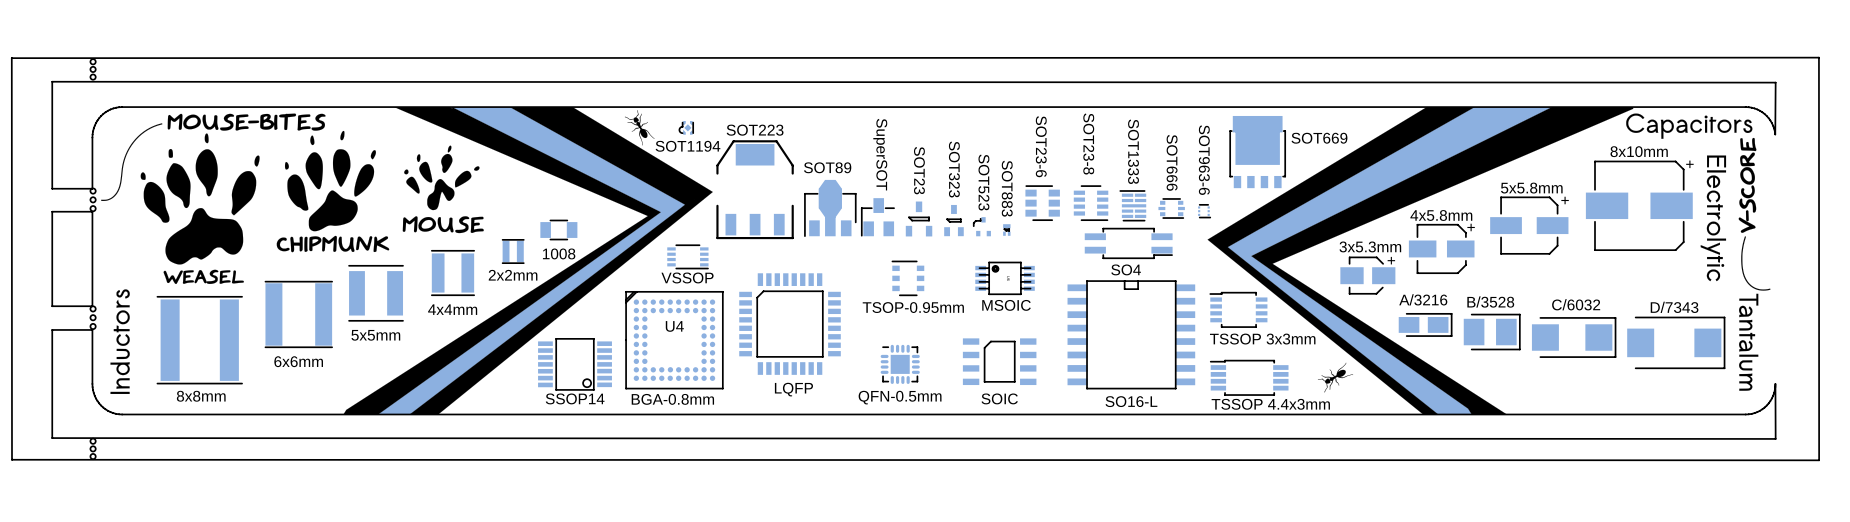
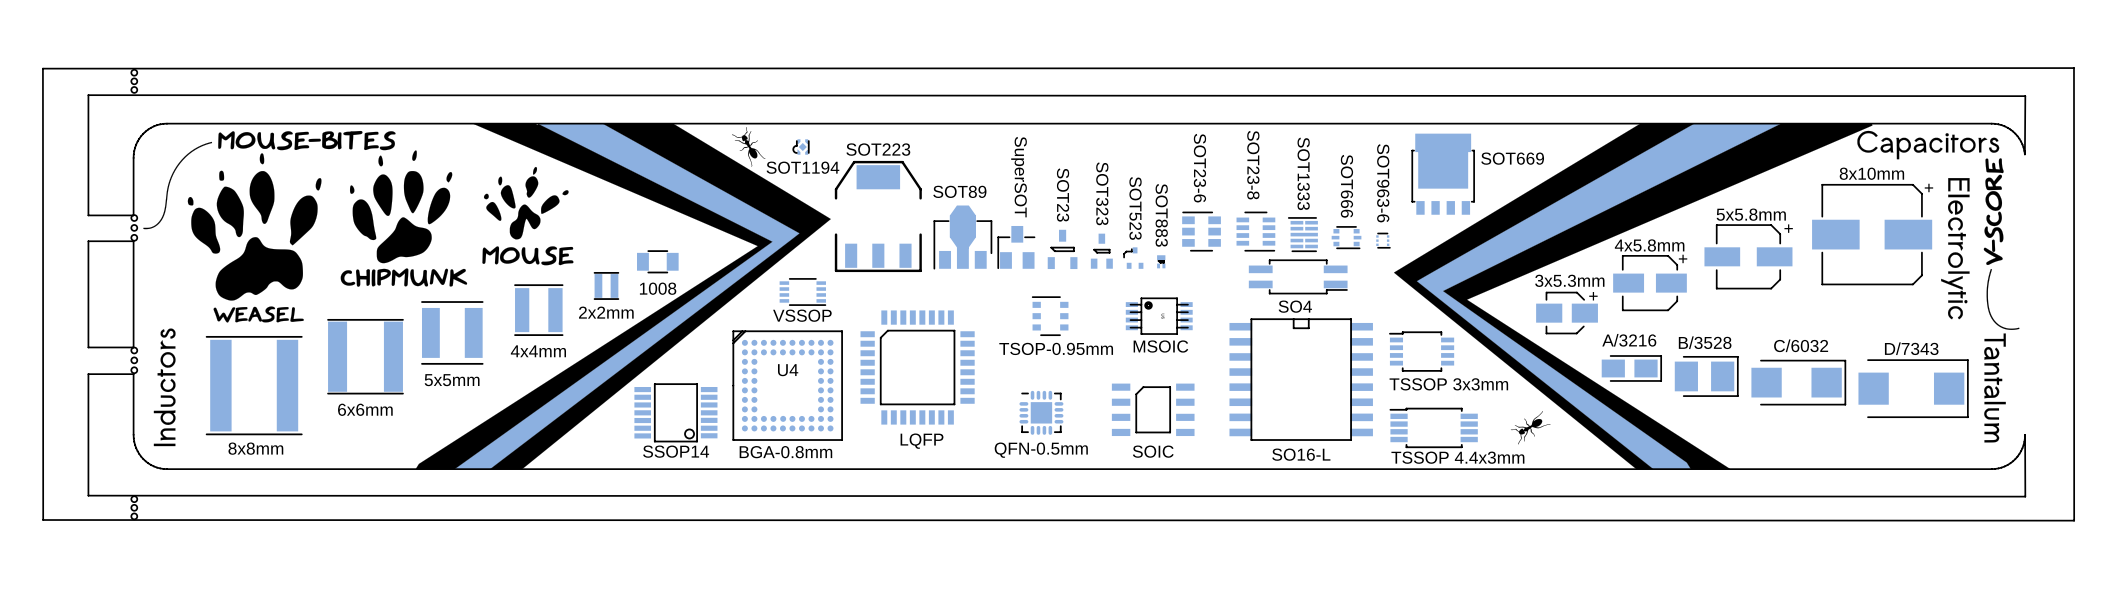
part footprint: [11, 57, 1820, 461] -> [42, 67, 2075, 522]

